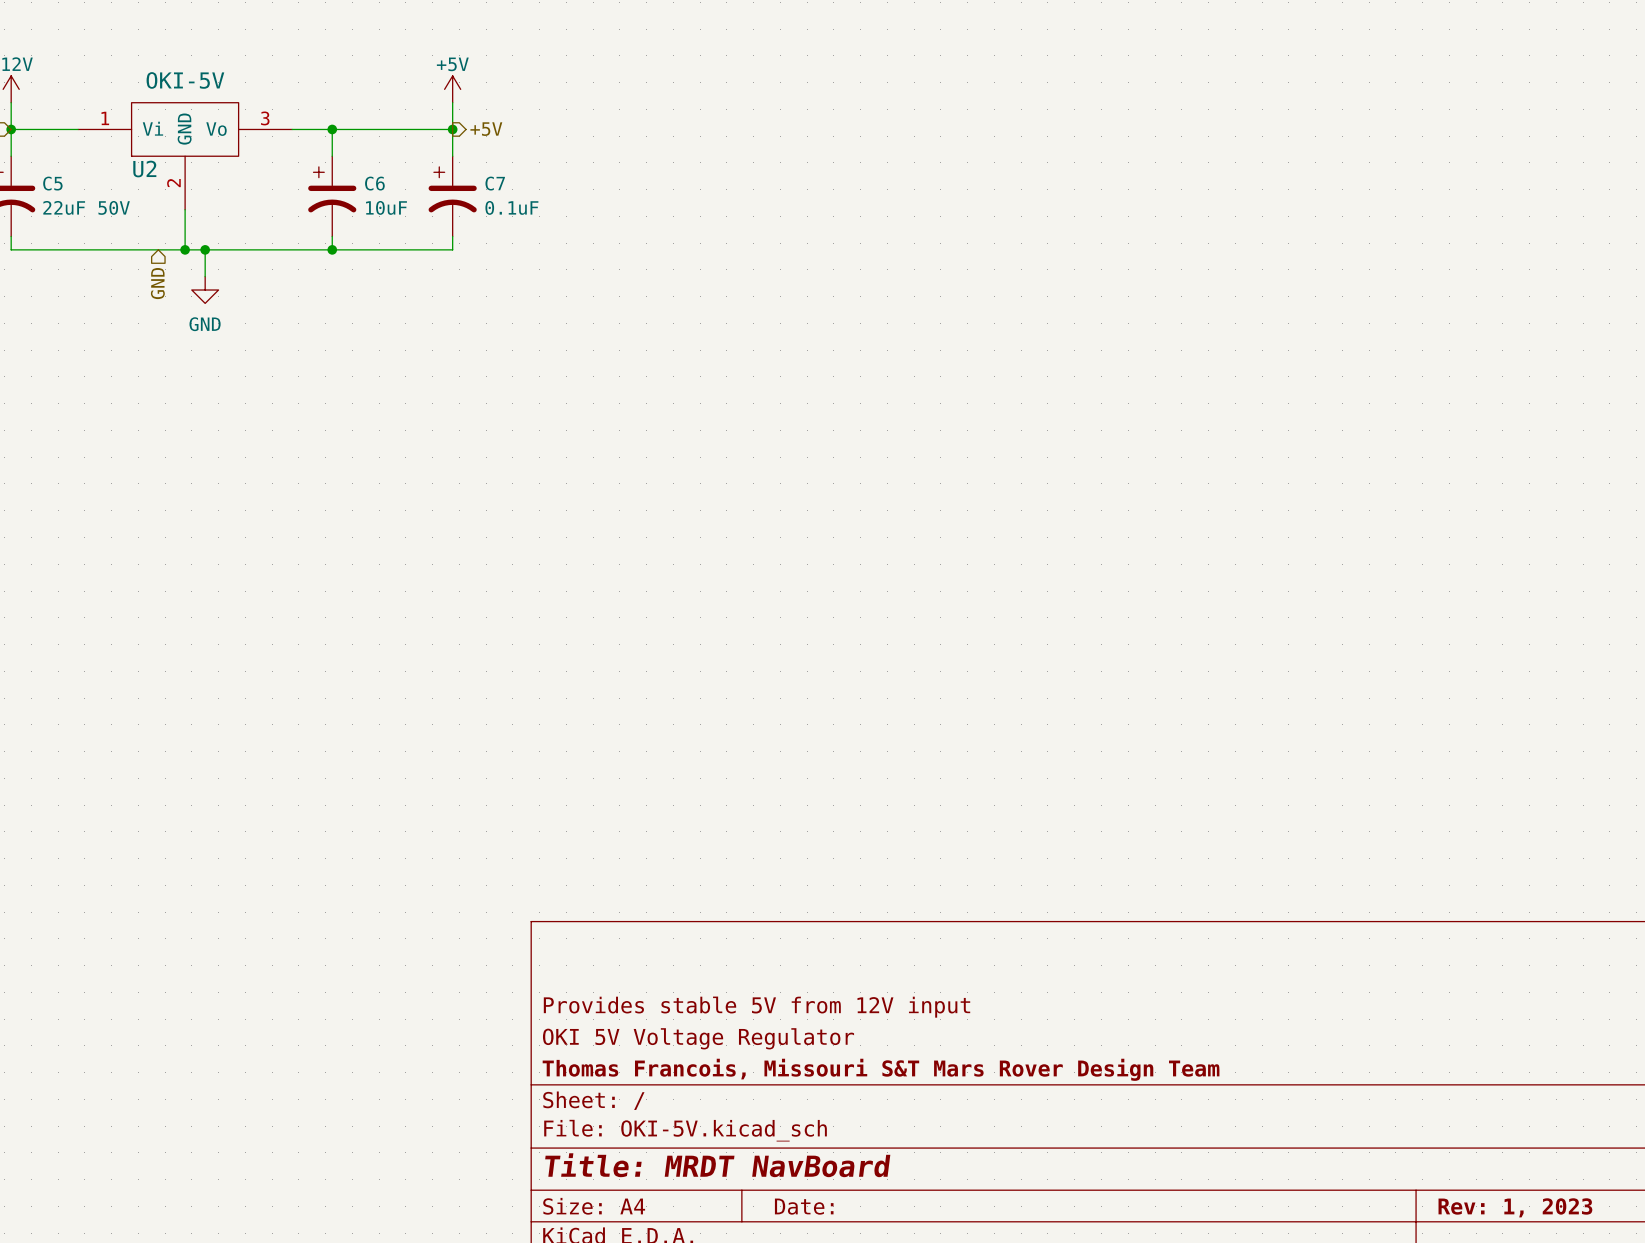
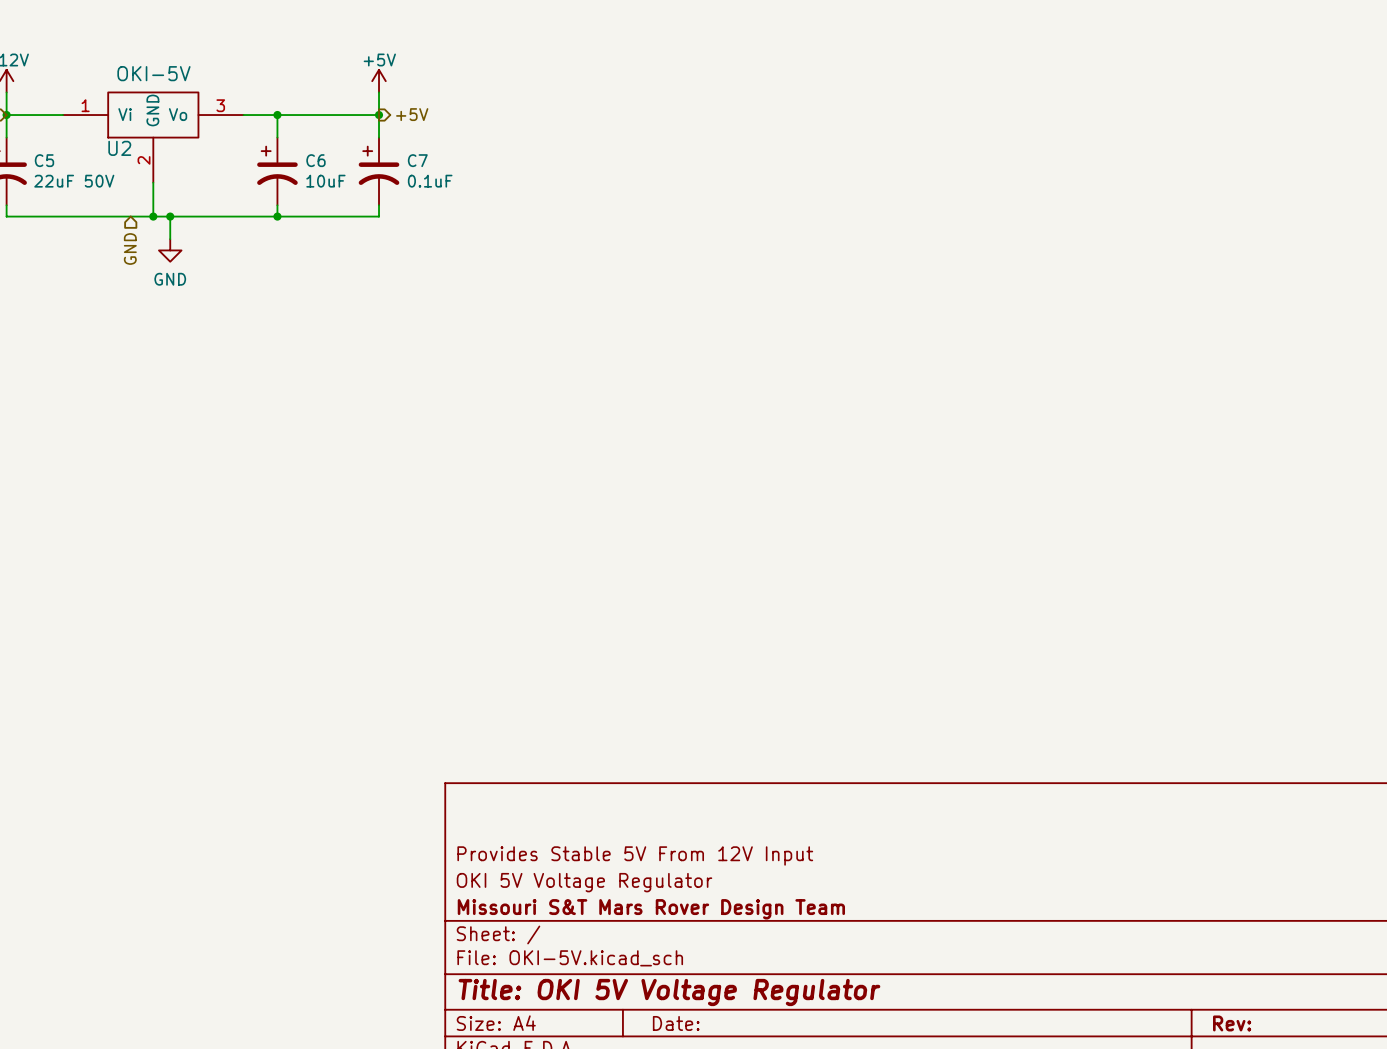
title block: Provides stable 5V from 12V input (757, 1007) -> Provides Stable 5V From 12V Input (635, 855)
title block: Thomas Francois, Missouri S&T Mars Rover Design Team (881, 1069) -> Missouri S&T Mars Rover Design Team (651, 909)
title block: Title: MRDT NavBoard (717, 1165) -> Title: OKI 5V Voltage Regulator (669, 992)
title block: Rev: 1, 2023 (1515, 1207) -> Rev: (1232, 1023)

